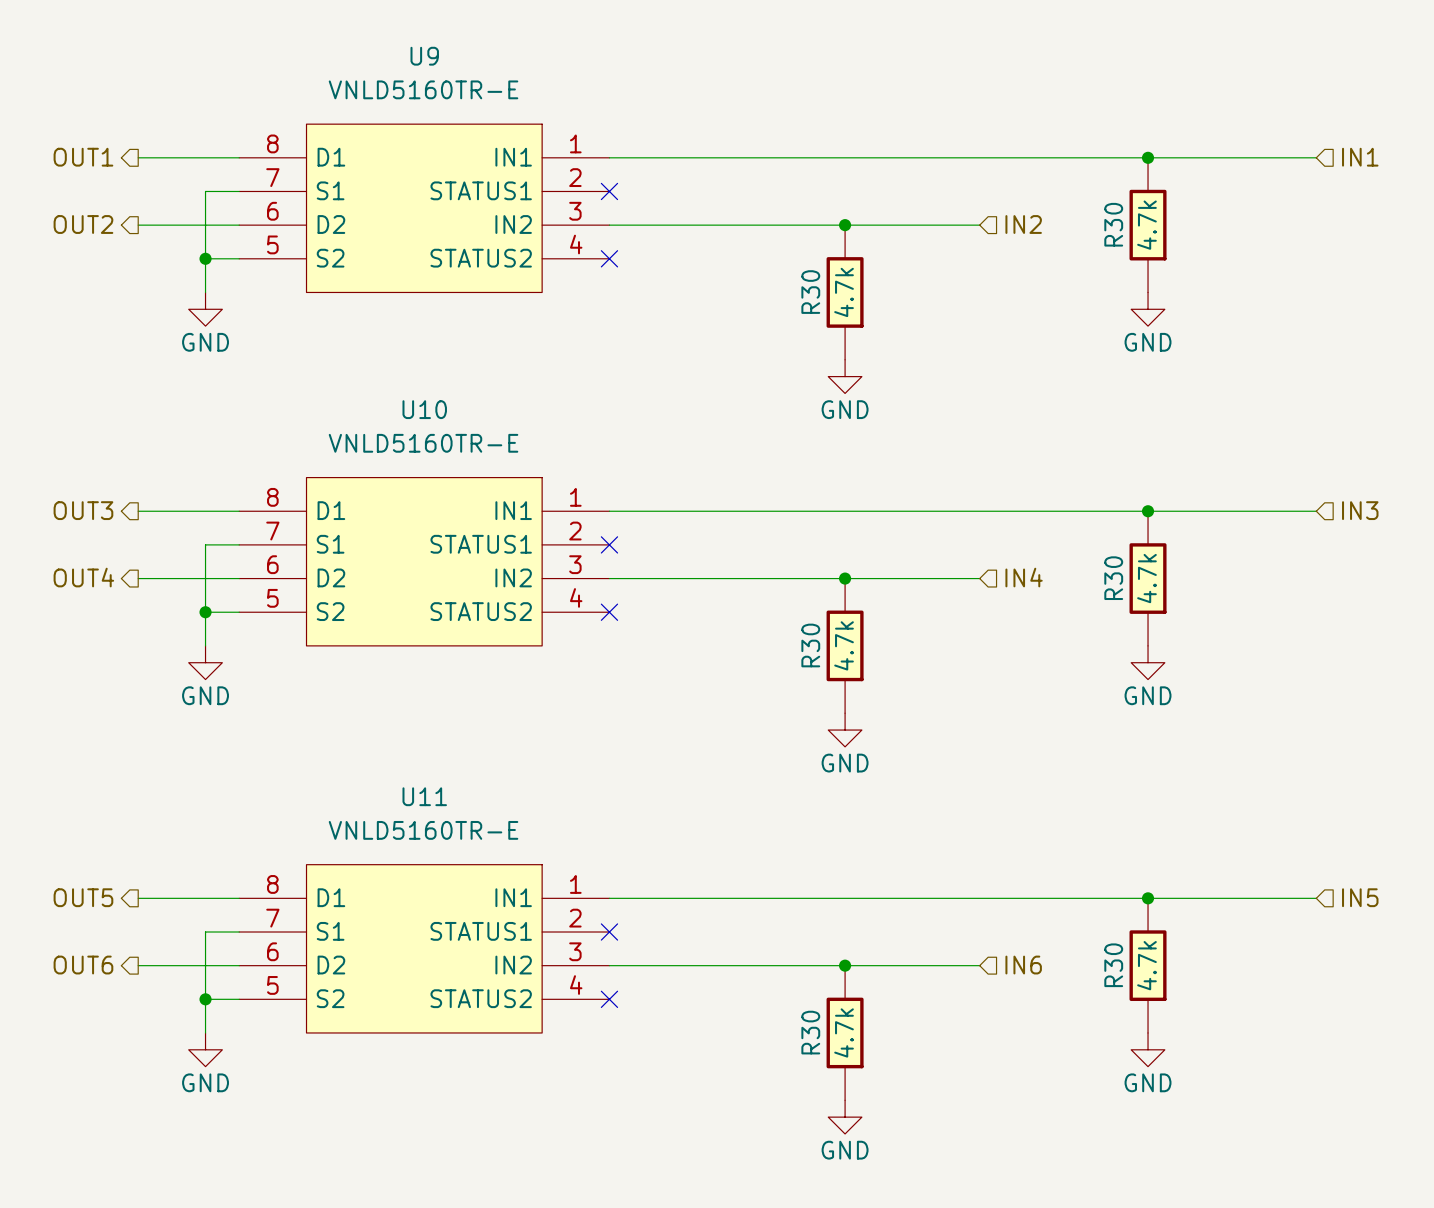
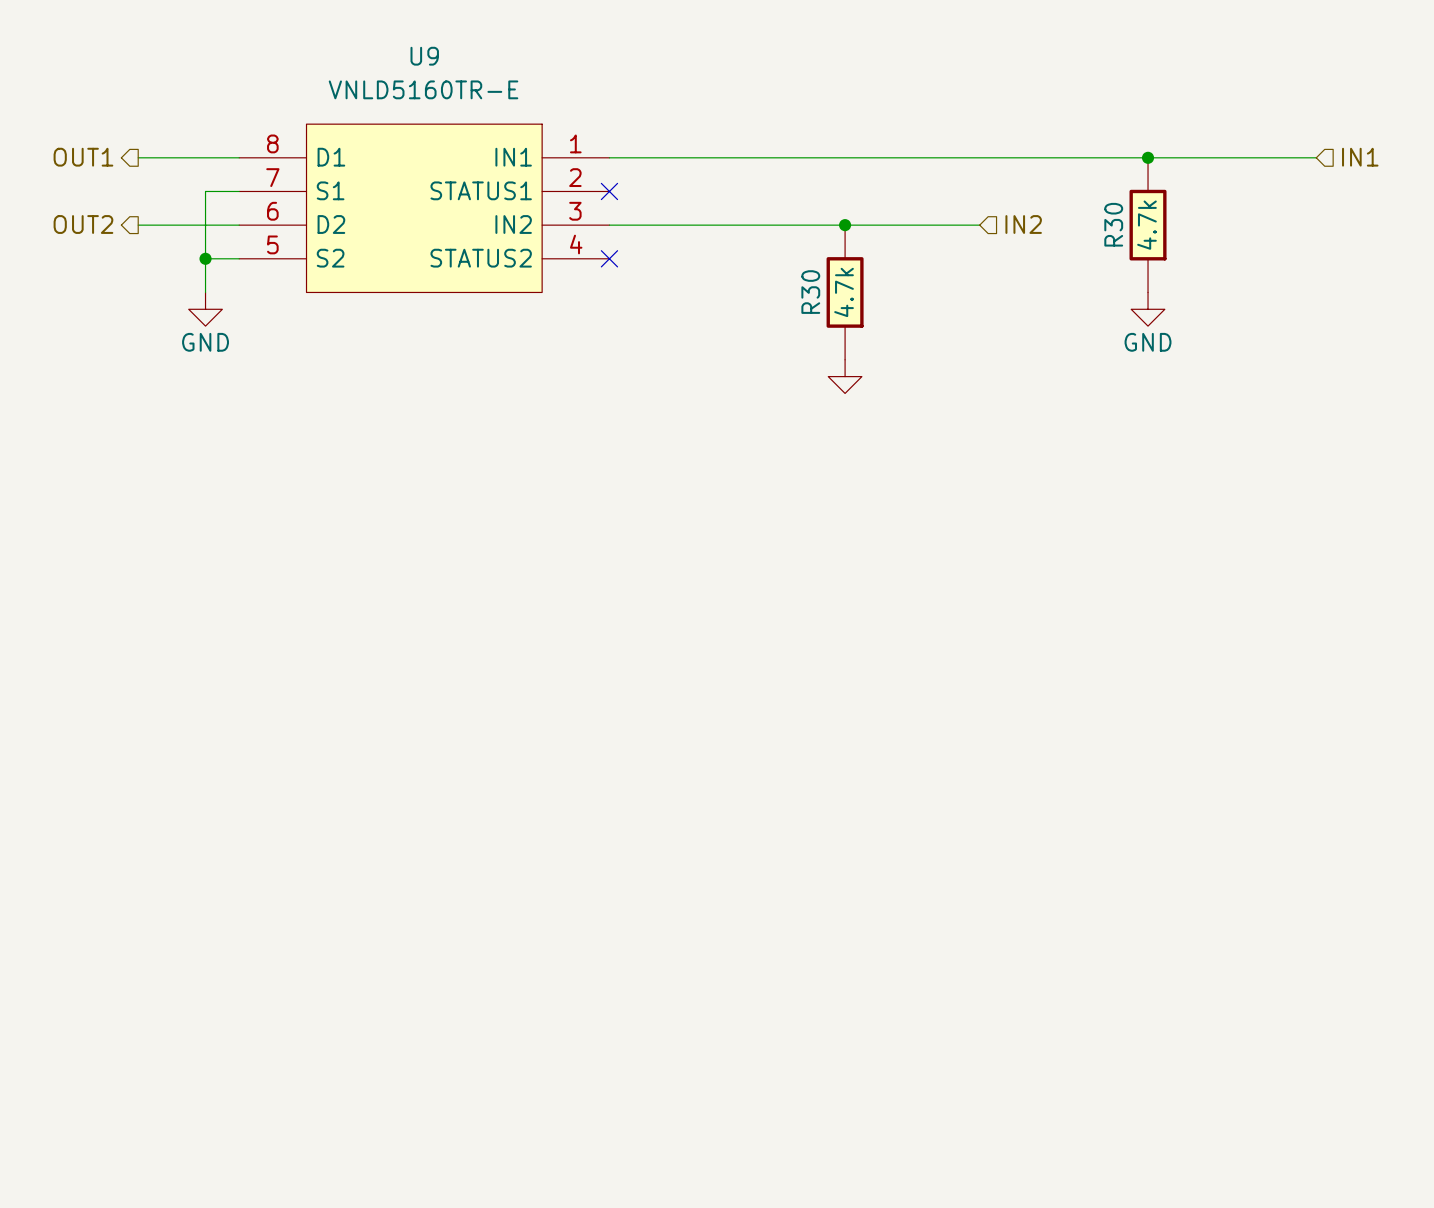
power symbol text: GND (845, 409) -> none
hierarchical label: OUT3 (83, 510) -> none
hierarchical label: IN3 (1360, 510) -> none
wire: (138, 511) (239, 511) -> none
wire: (609, 511) (1316, 511) -> none
junction: (1148, 511) -> none
wire: (239, 544) (205, 544) (205, 645) -> none
no-connect mark: (609, 544) -> none
U10: VNLD5160TR-E (424, 561) -> none
hierarchical label: OUT4 (83, 577) -> none
hierarchical label: IN4 (1024, 577) -> none
wire: (138, 578) (239, 578) -> none
wire: (609, 578) (979, 578) -> none
junction: (845, 578) -> none
R30: 4.7k (1148, 578) -> none
wire: (205, 612) (239, 612) -> none
junction: (205, 612) -> none
no-connect mark: (609, 612) -> none
R30: 4.7k (845, 645) -> none
power symbol: GND (205, 662) -> none
power symbol: GND (1148, 662) -> none
power symbol: GND (845, 730) -> none
hierarchical label: OUT5 (83, 897) -> none
hierarchical label: IN5 (1360, 897) -> none
wire: (138, 898) (239, 898) -> none
wire: (609, 898) (1316, 898) -> none
junction: (1148, 898) -> none
wire: (239, 932) (205, 932) (205, 1032) -> none
no-connect mark: (609, 932) -> none
U11: VNLD5160TR-E (424, 948) -> none
hierarchical label: OUT6 (83, 965) -> none
wire: (138, 965) (239, 965) -> none
wire: (609, 965) (979, 965) -> none
junction: (845, 965) -> none
hierarchical label: IN6 (1023, 965) -> none
R30: 4.7k (1148, 965) -> none
wire: (205, 999) (239, 999) -> none
junction: (205, 999) -> none
no-connect mark: (609, 999) -> none
R30: 4.7k (845, 1032) -> none
power symbol: GND (205, 1049) -> none
power symbol: GND (1148, 1049) -> none
power symbol: GND (845, 1117) -> none

